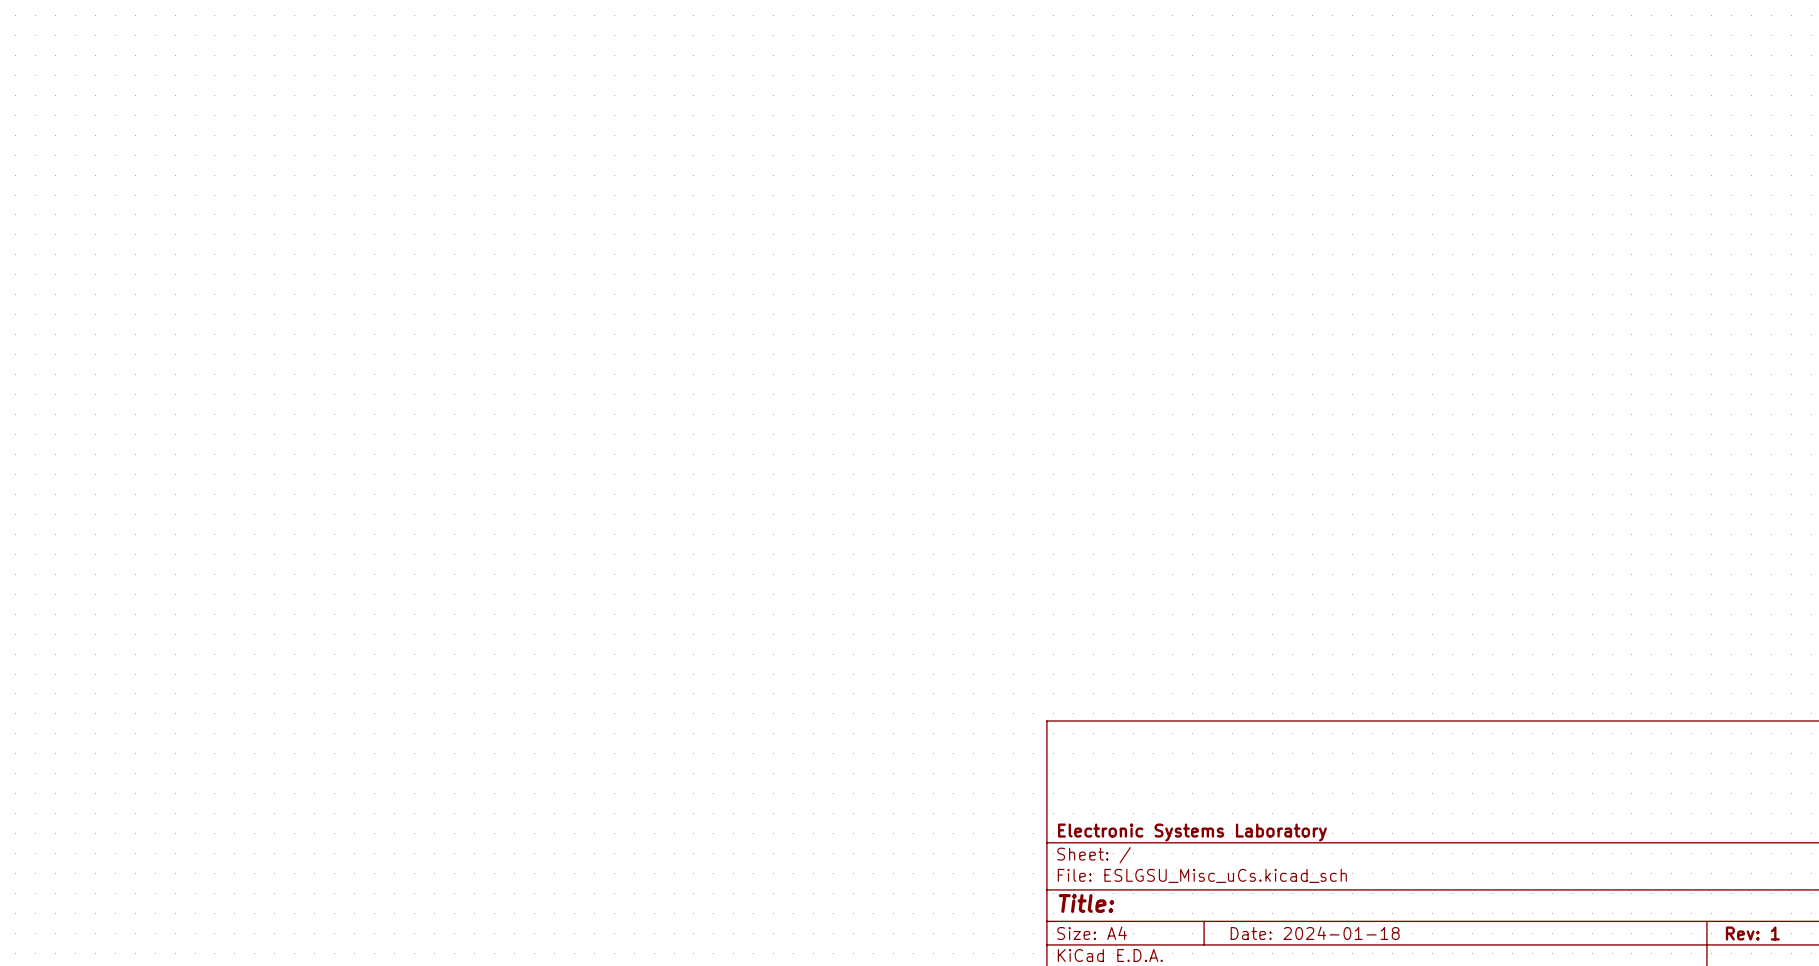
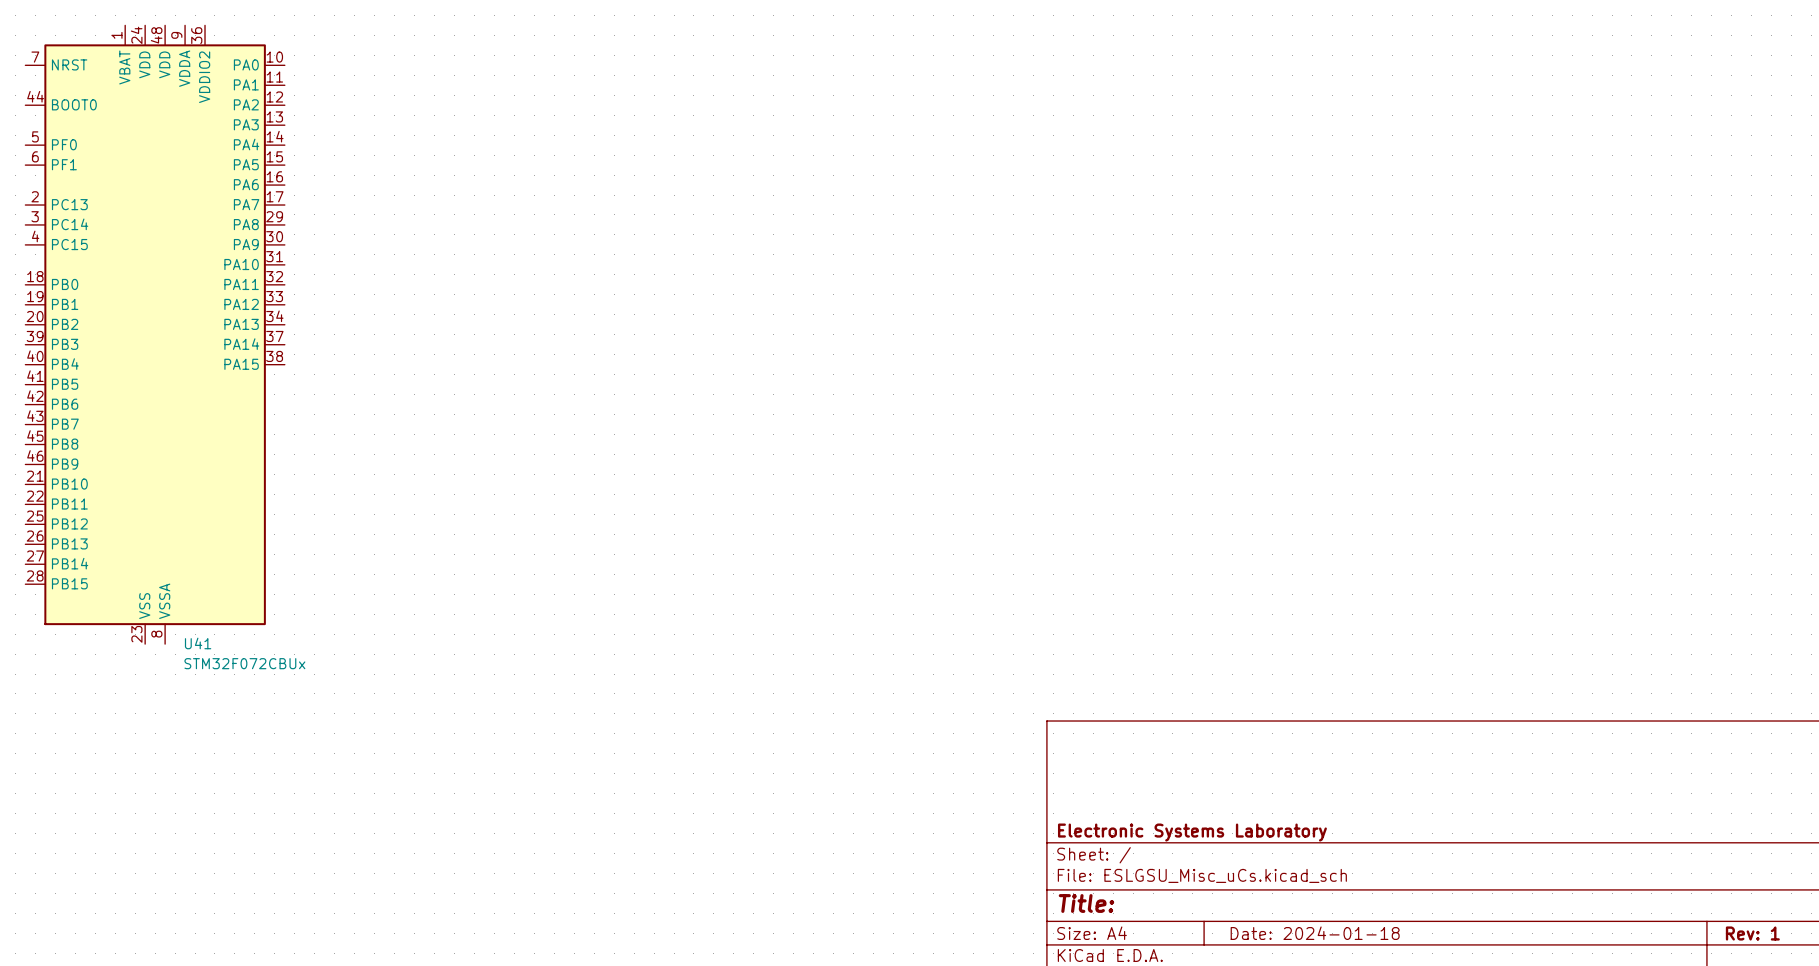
U41: none -> STM32F072CBUx (155, 334)

